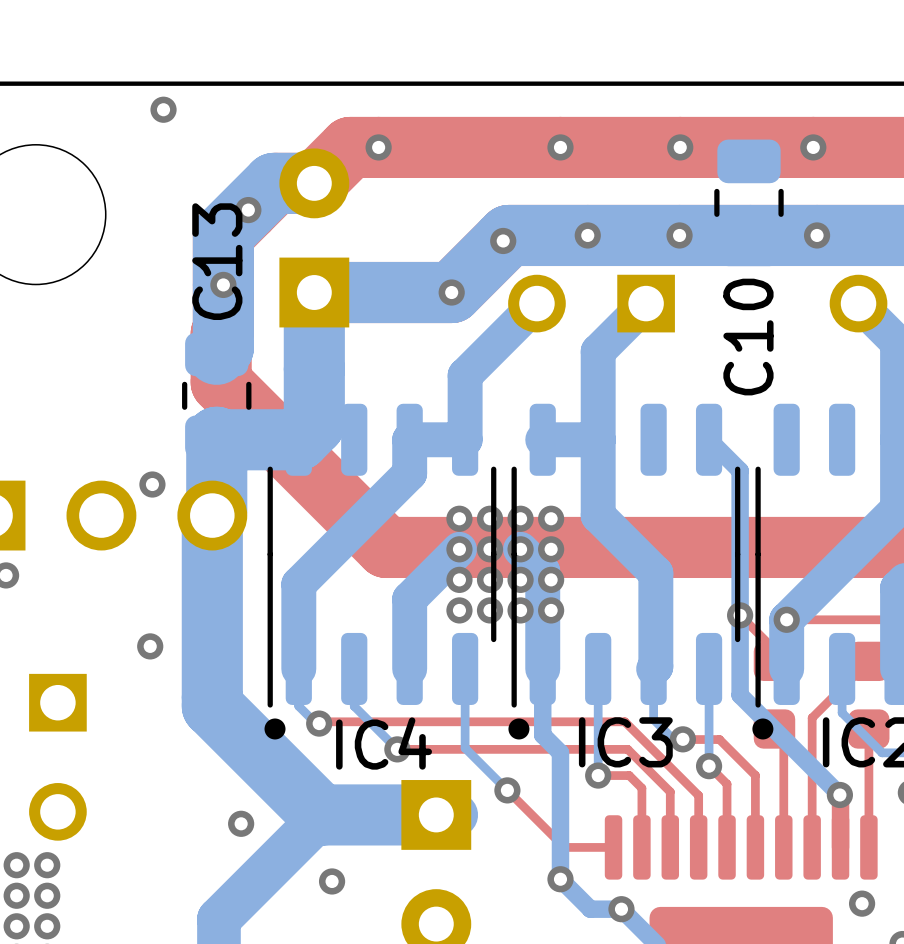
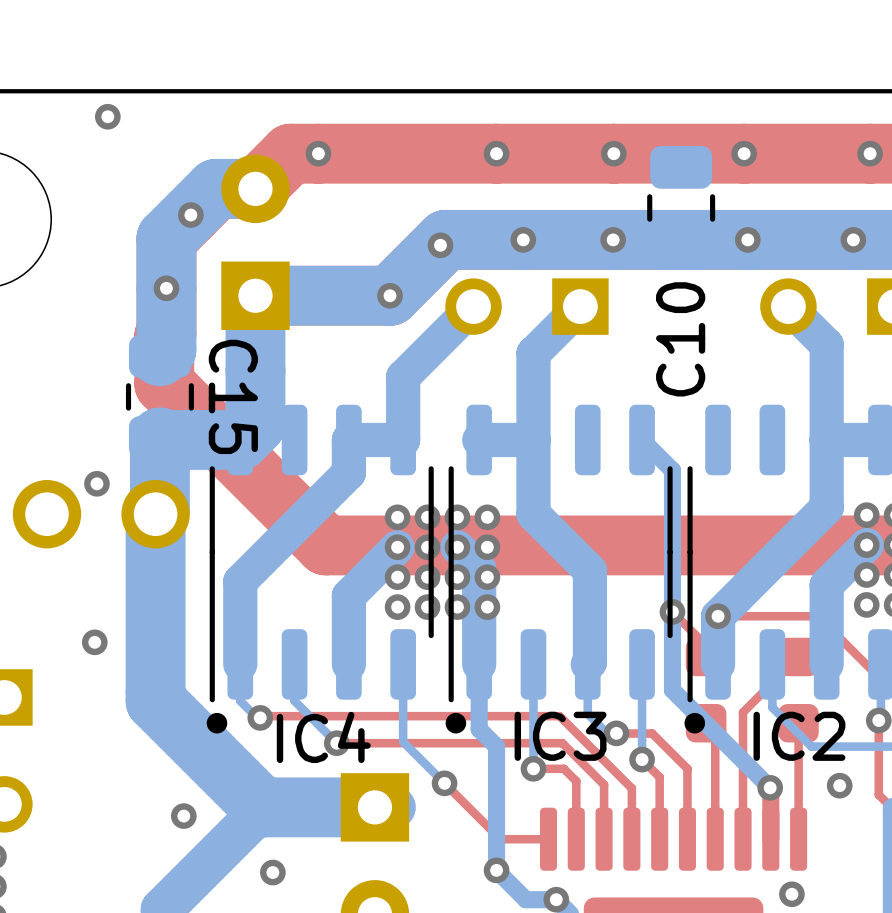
C13 name: C13 (217, 261) -> C15 (233, 396)

